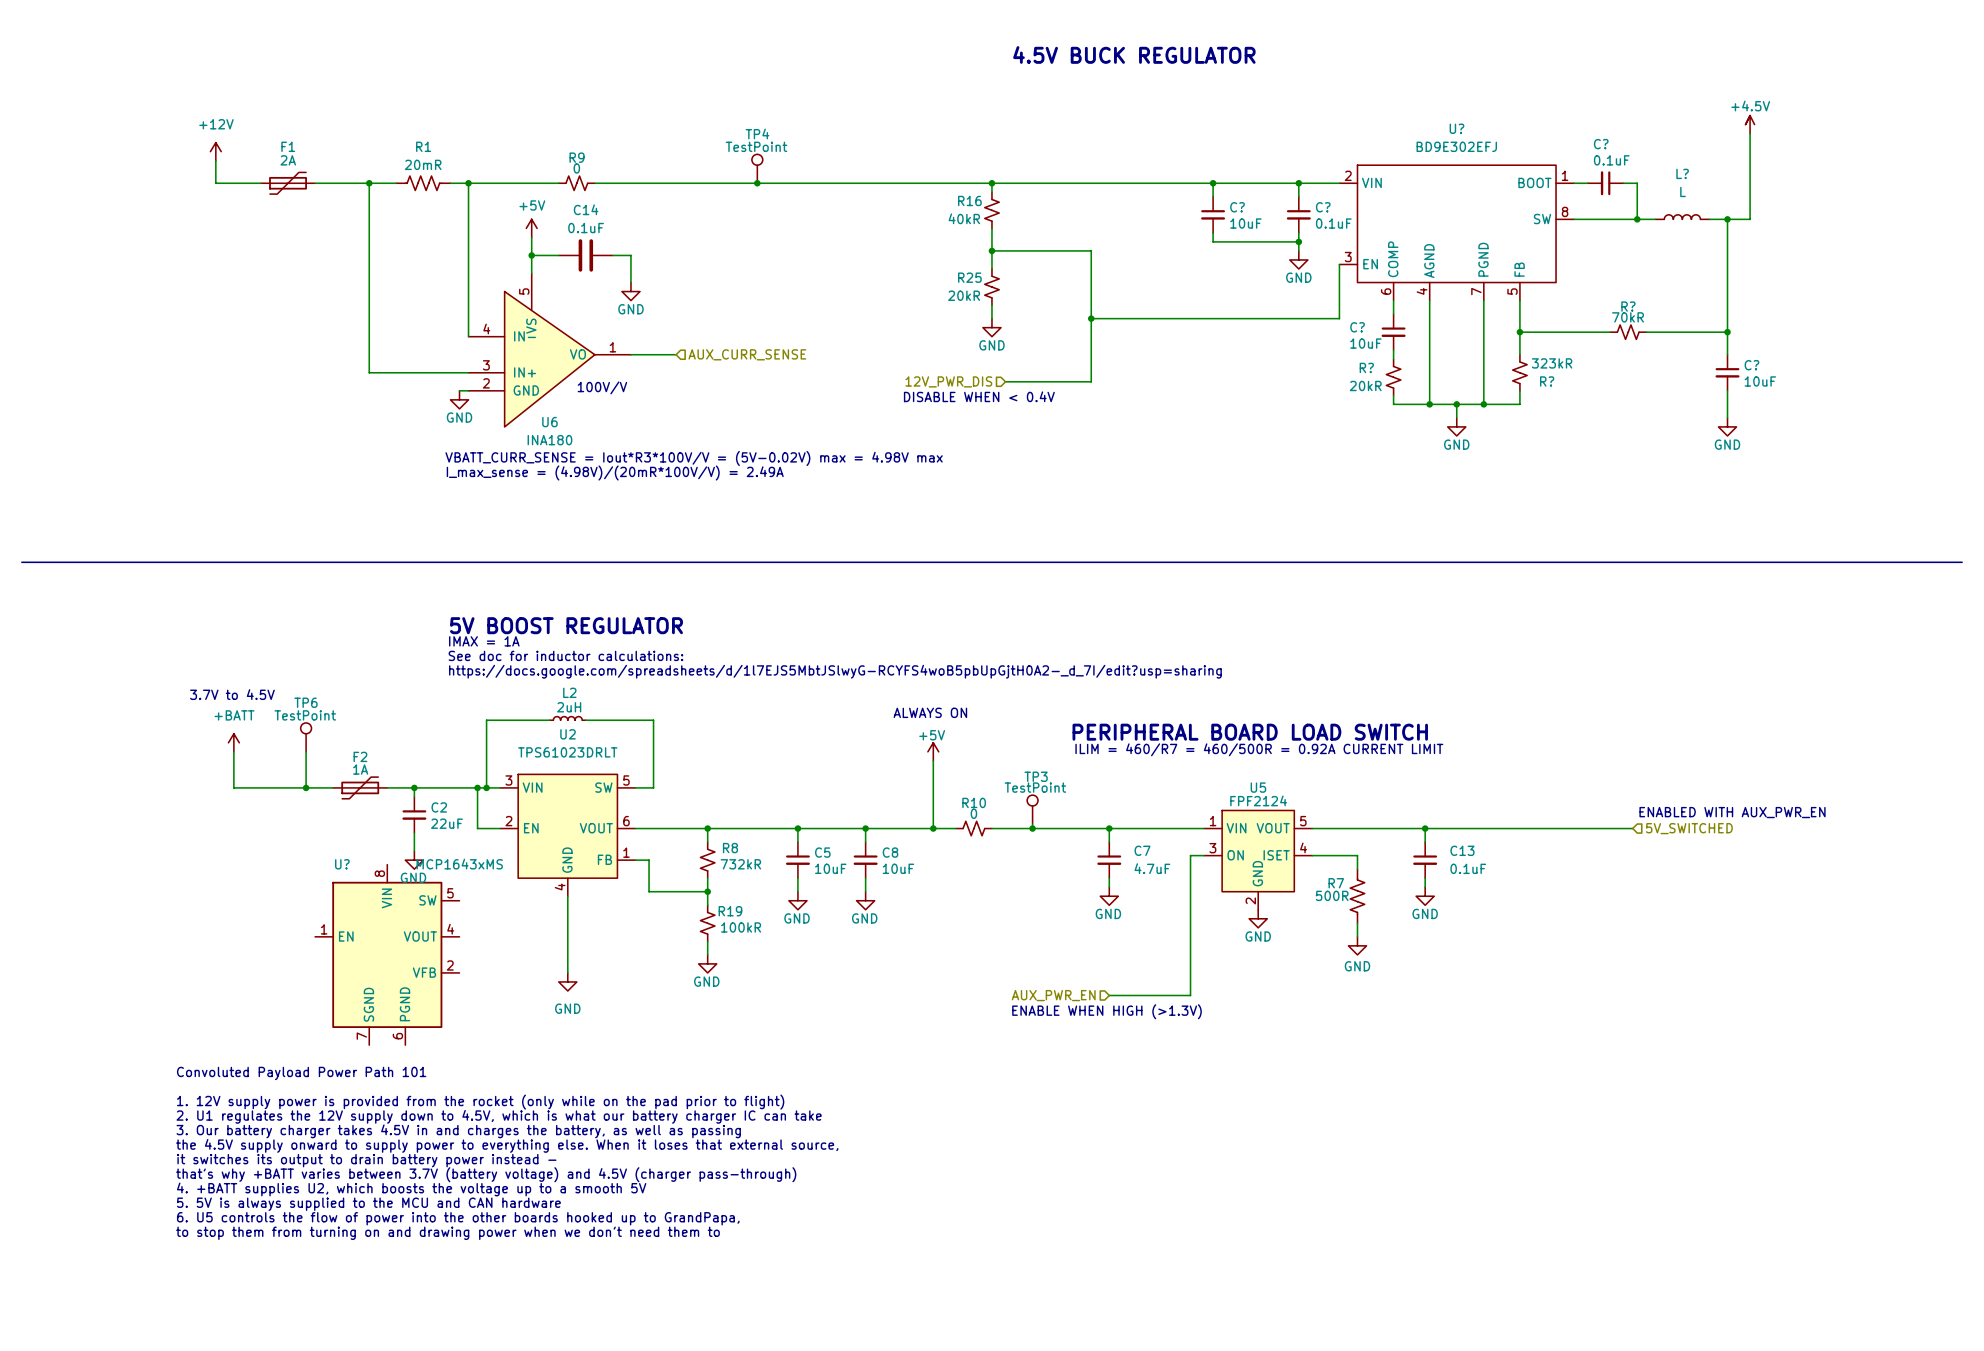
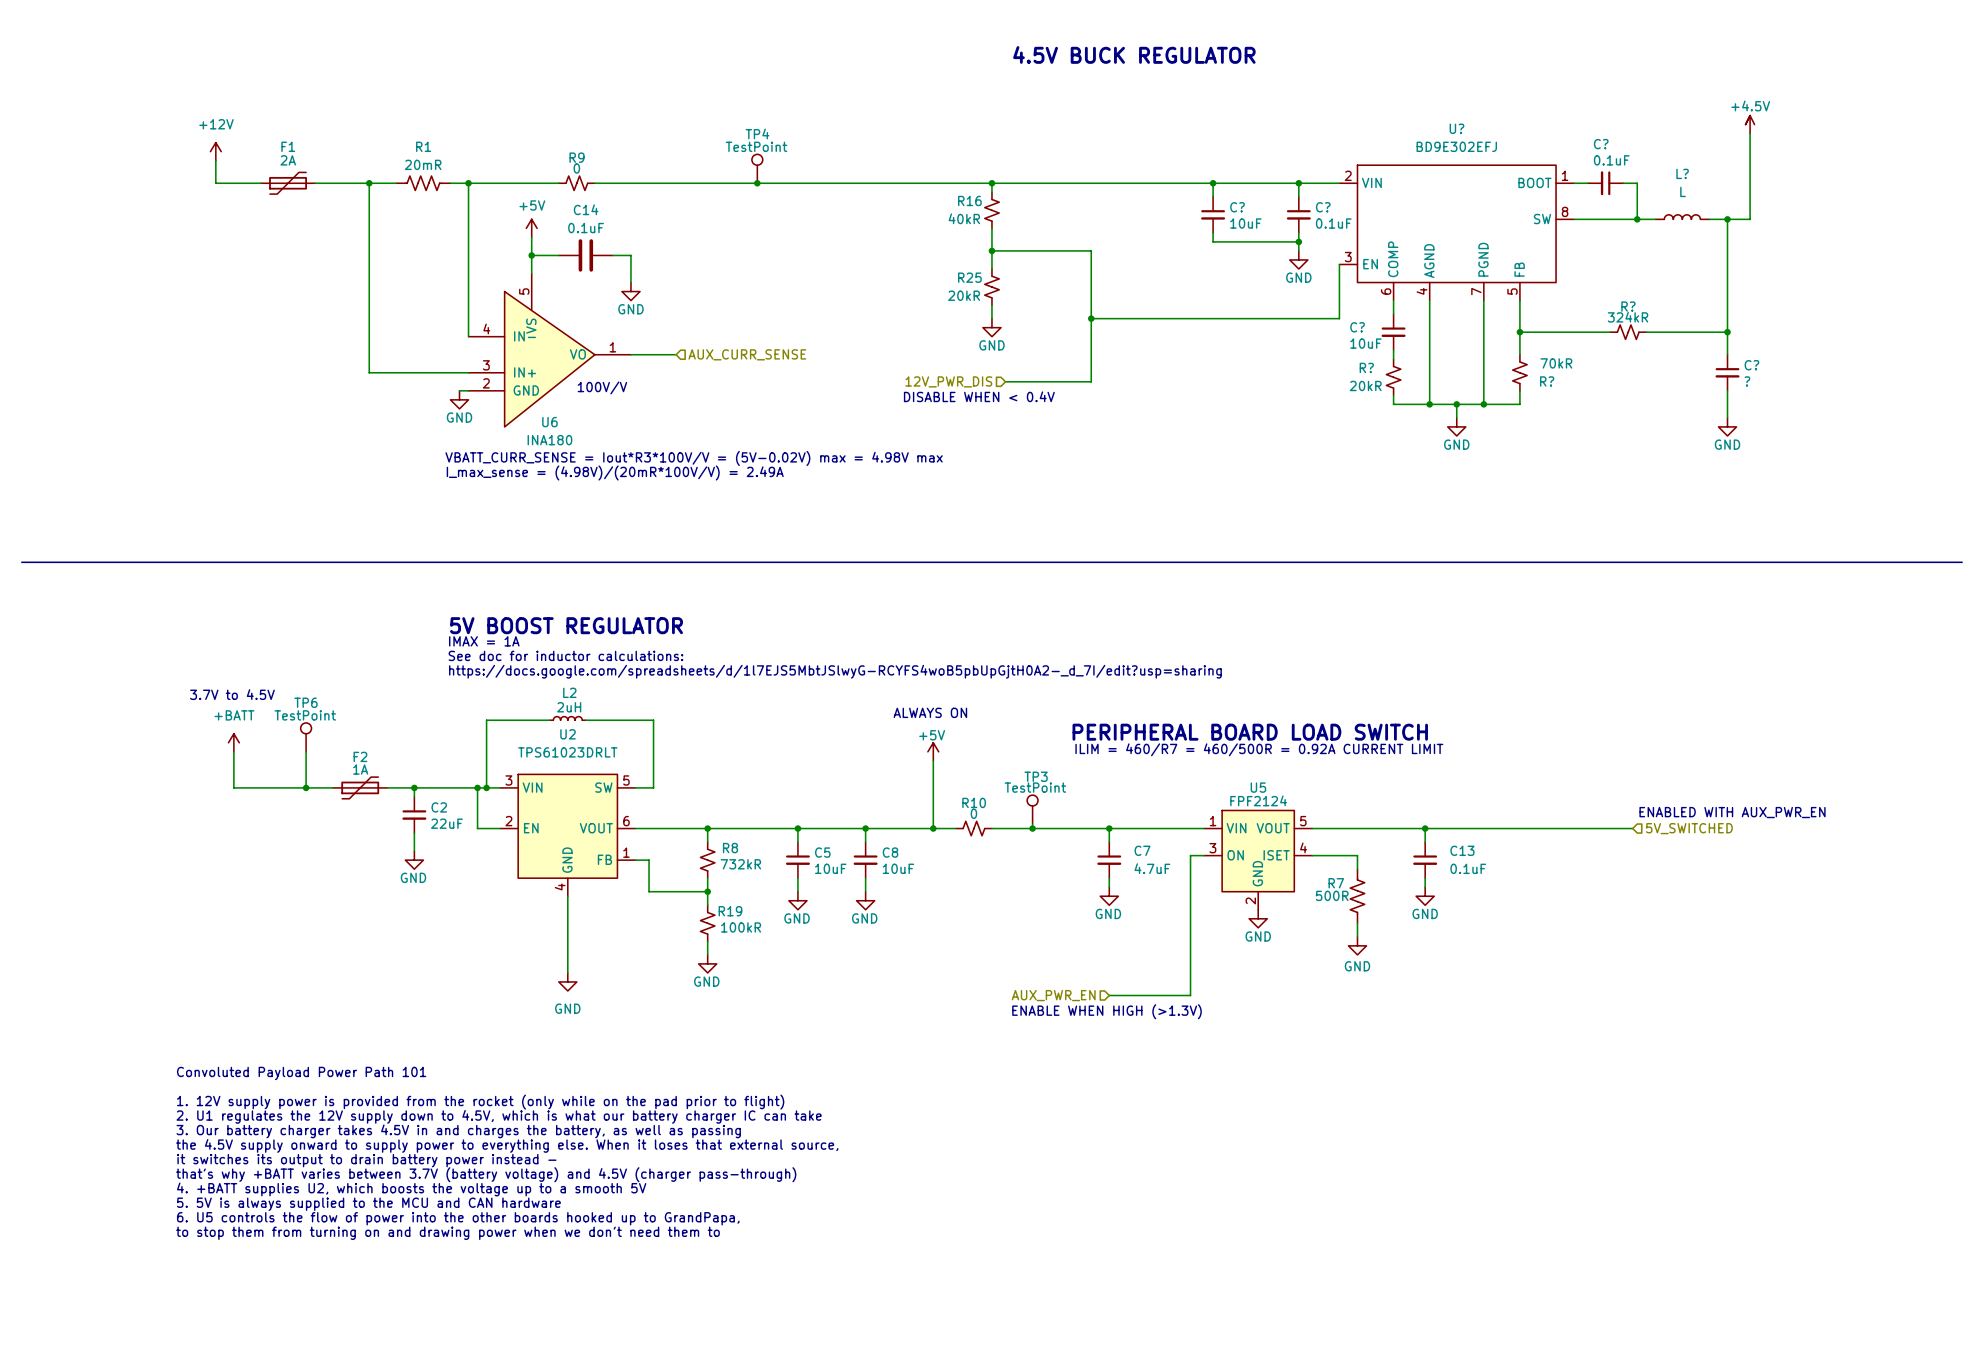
R? value: 70kR (1628, 317) -> 324kR (1628, 317)
R? value: 323kR (1552, 363) -> 70kR (1556, 363)
C? value: 10uF (1760, 381) -> ? (1747, 381)
U?: MCP1643xMS (387, 954) -> none

